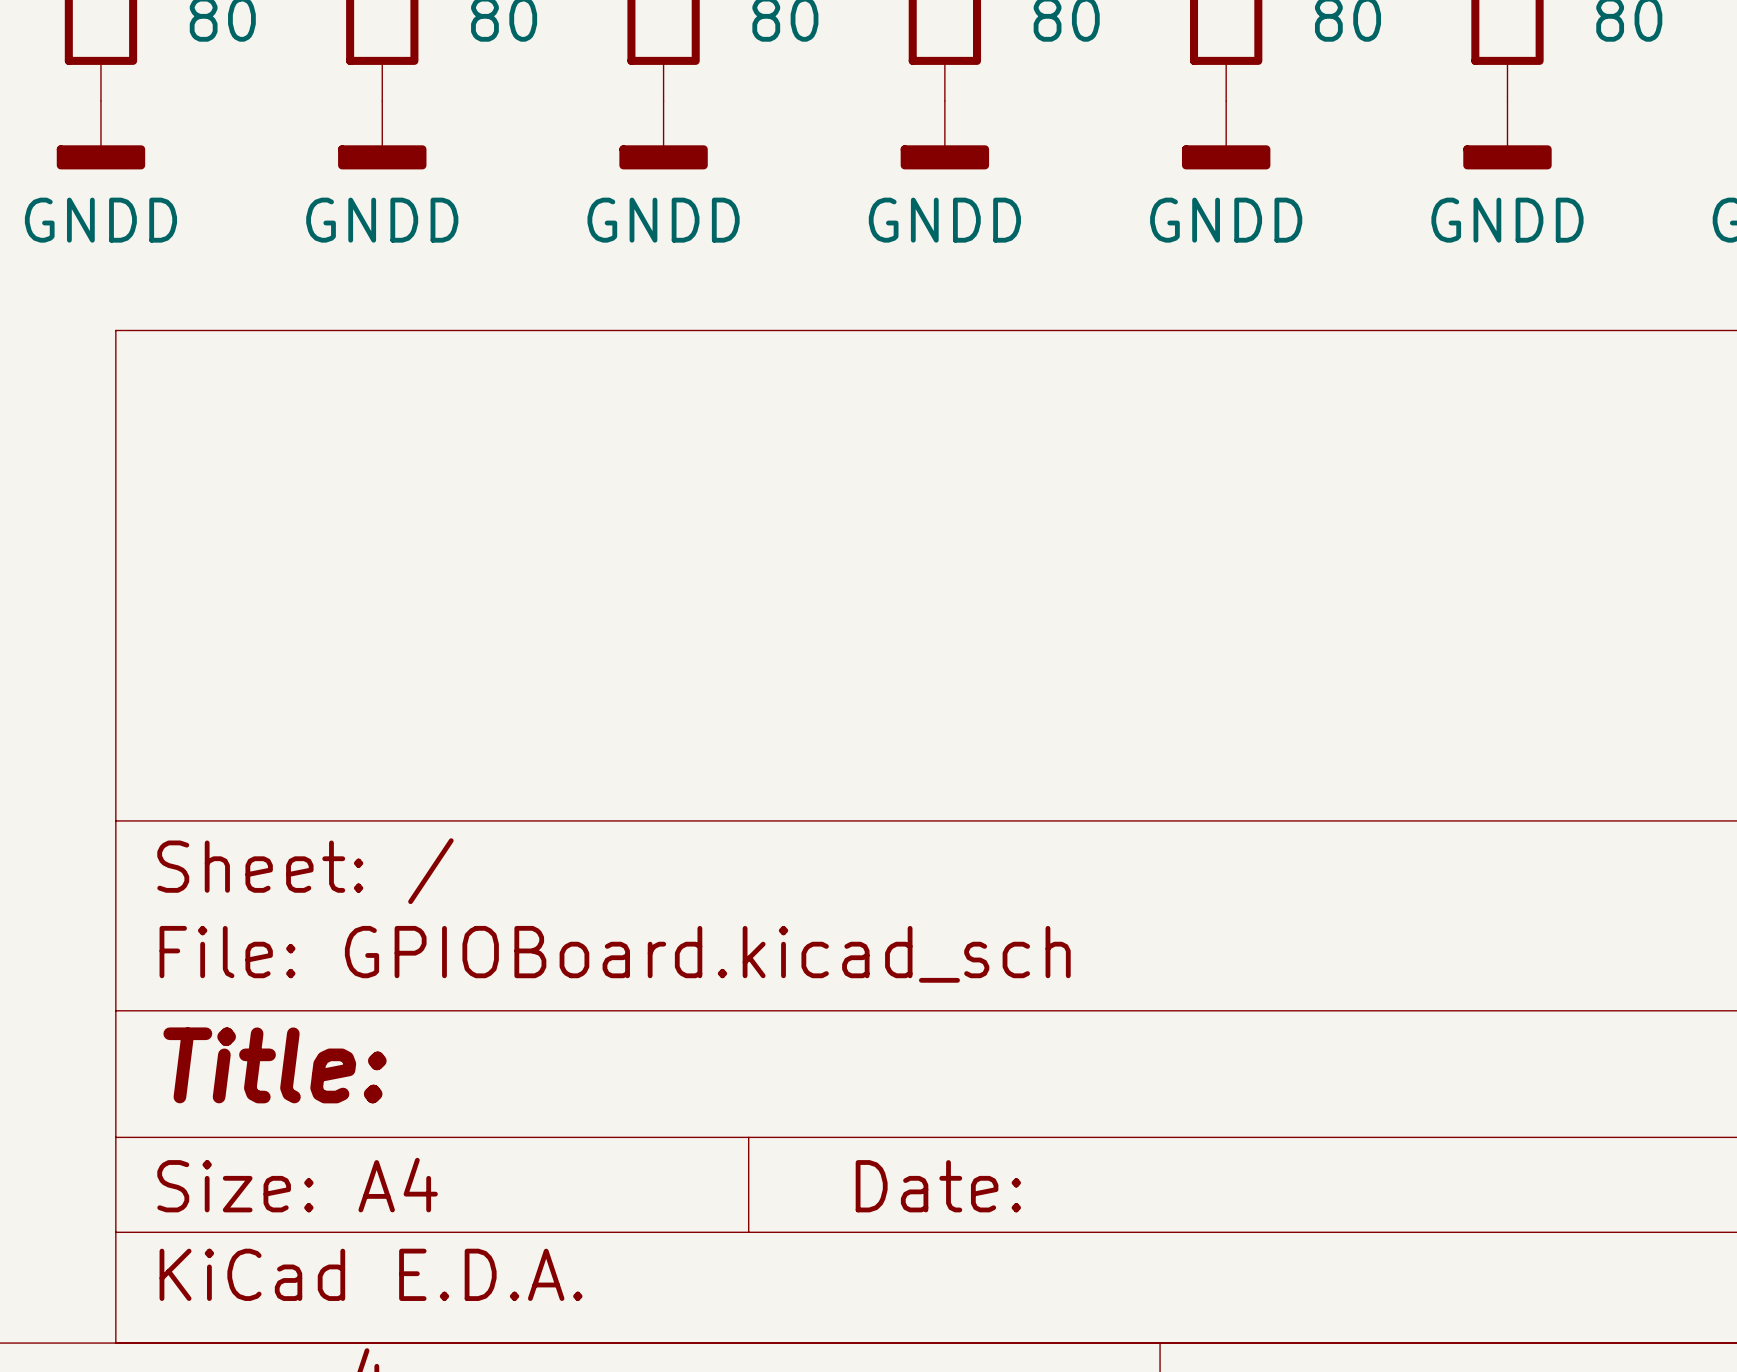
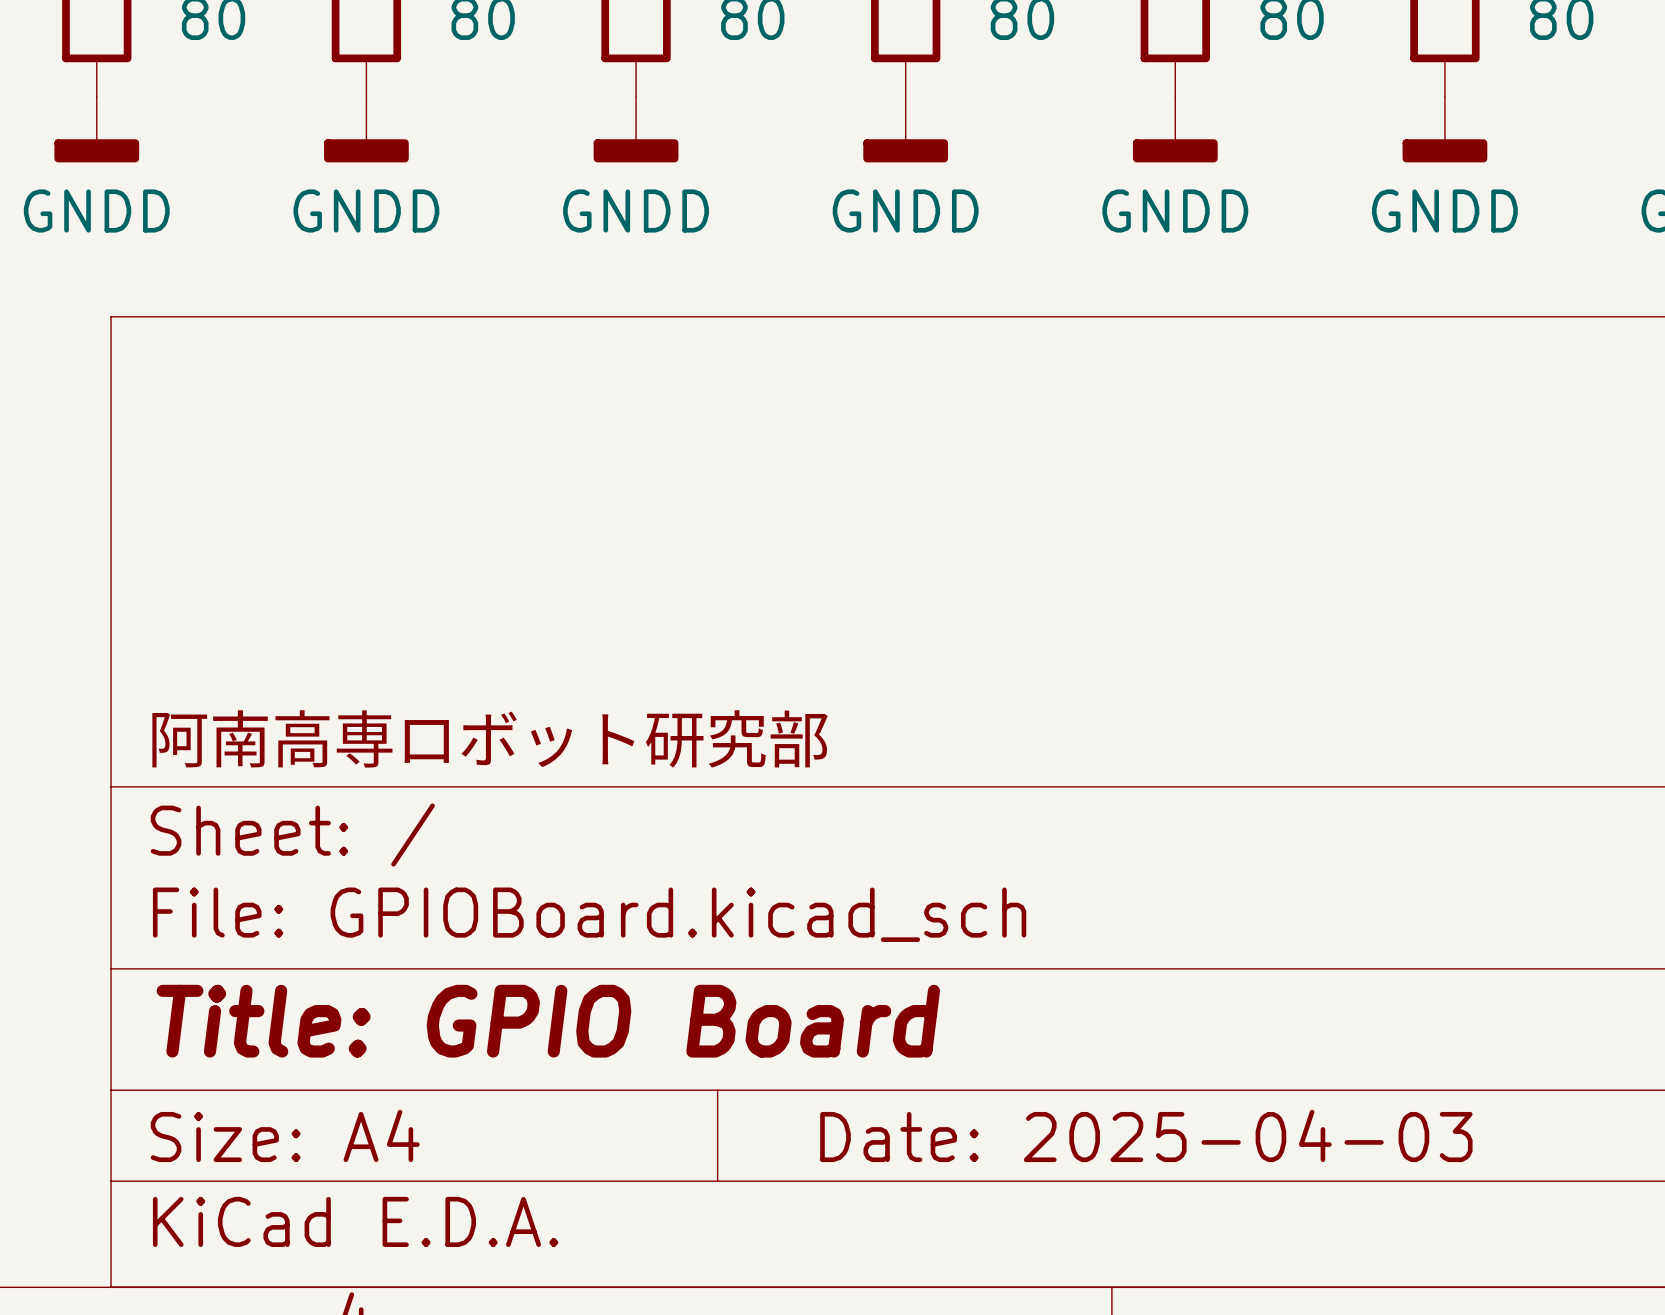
title block: none -> 阿南高専ロボット研究部 (490, 738)
title block: Title: (275, 1065) -> Title: GPIO Board (548, 1021)
title block: Date: (938, 1186) -> Date: 2025-04-03 (1146, 1135)

